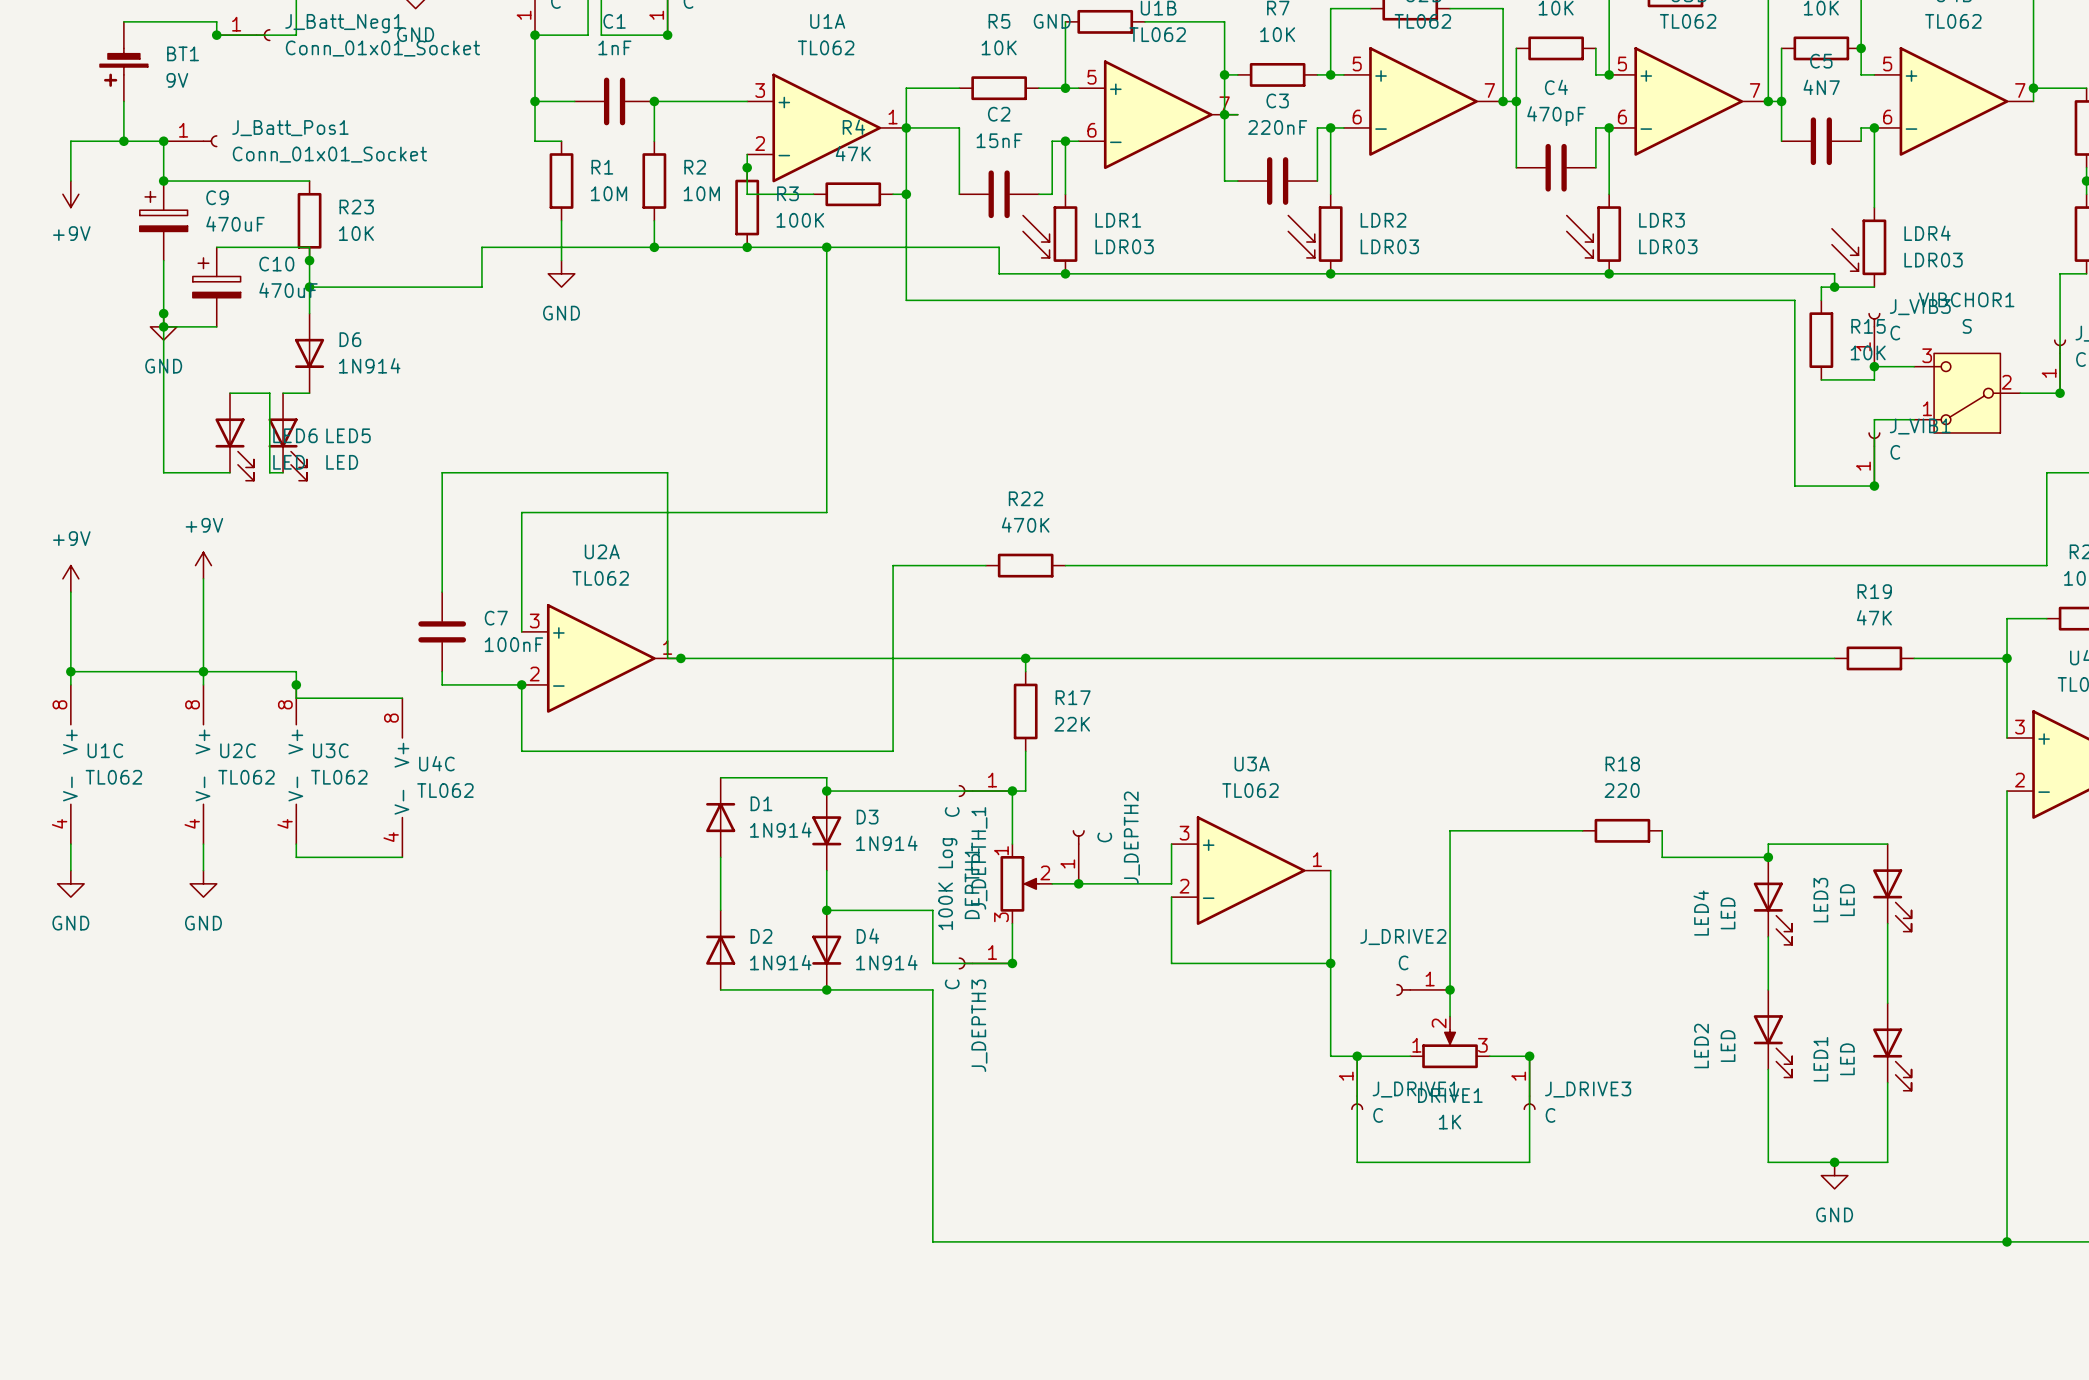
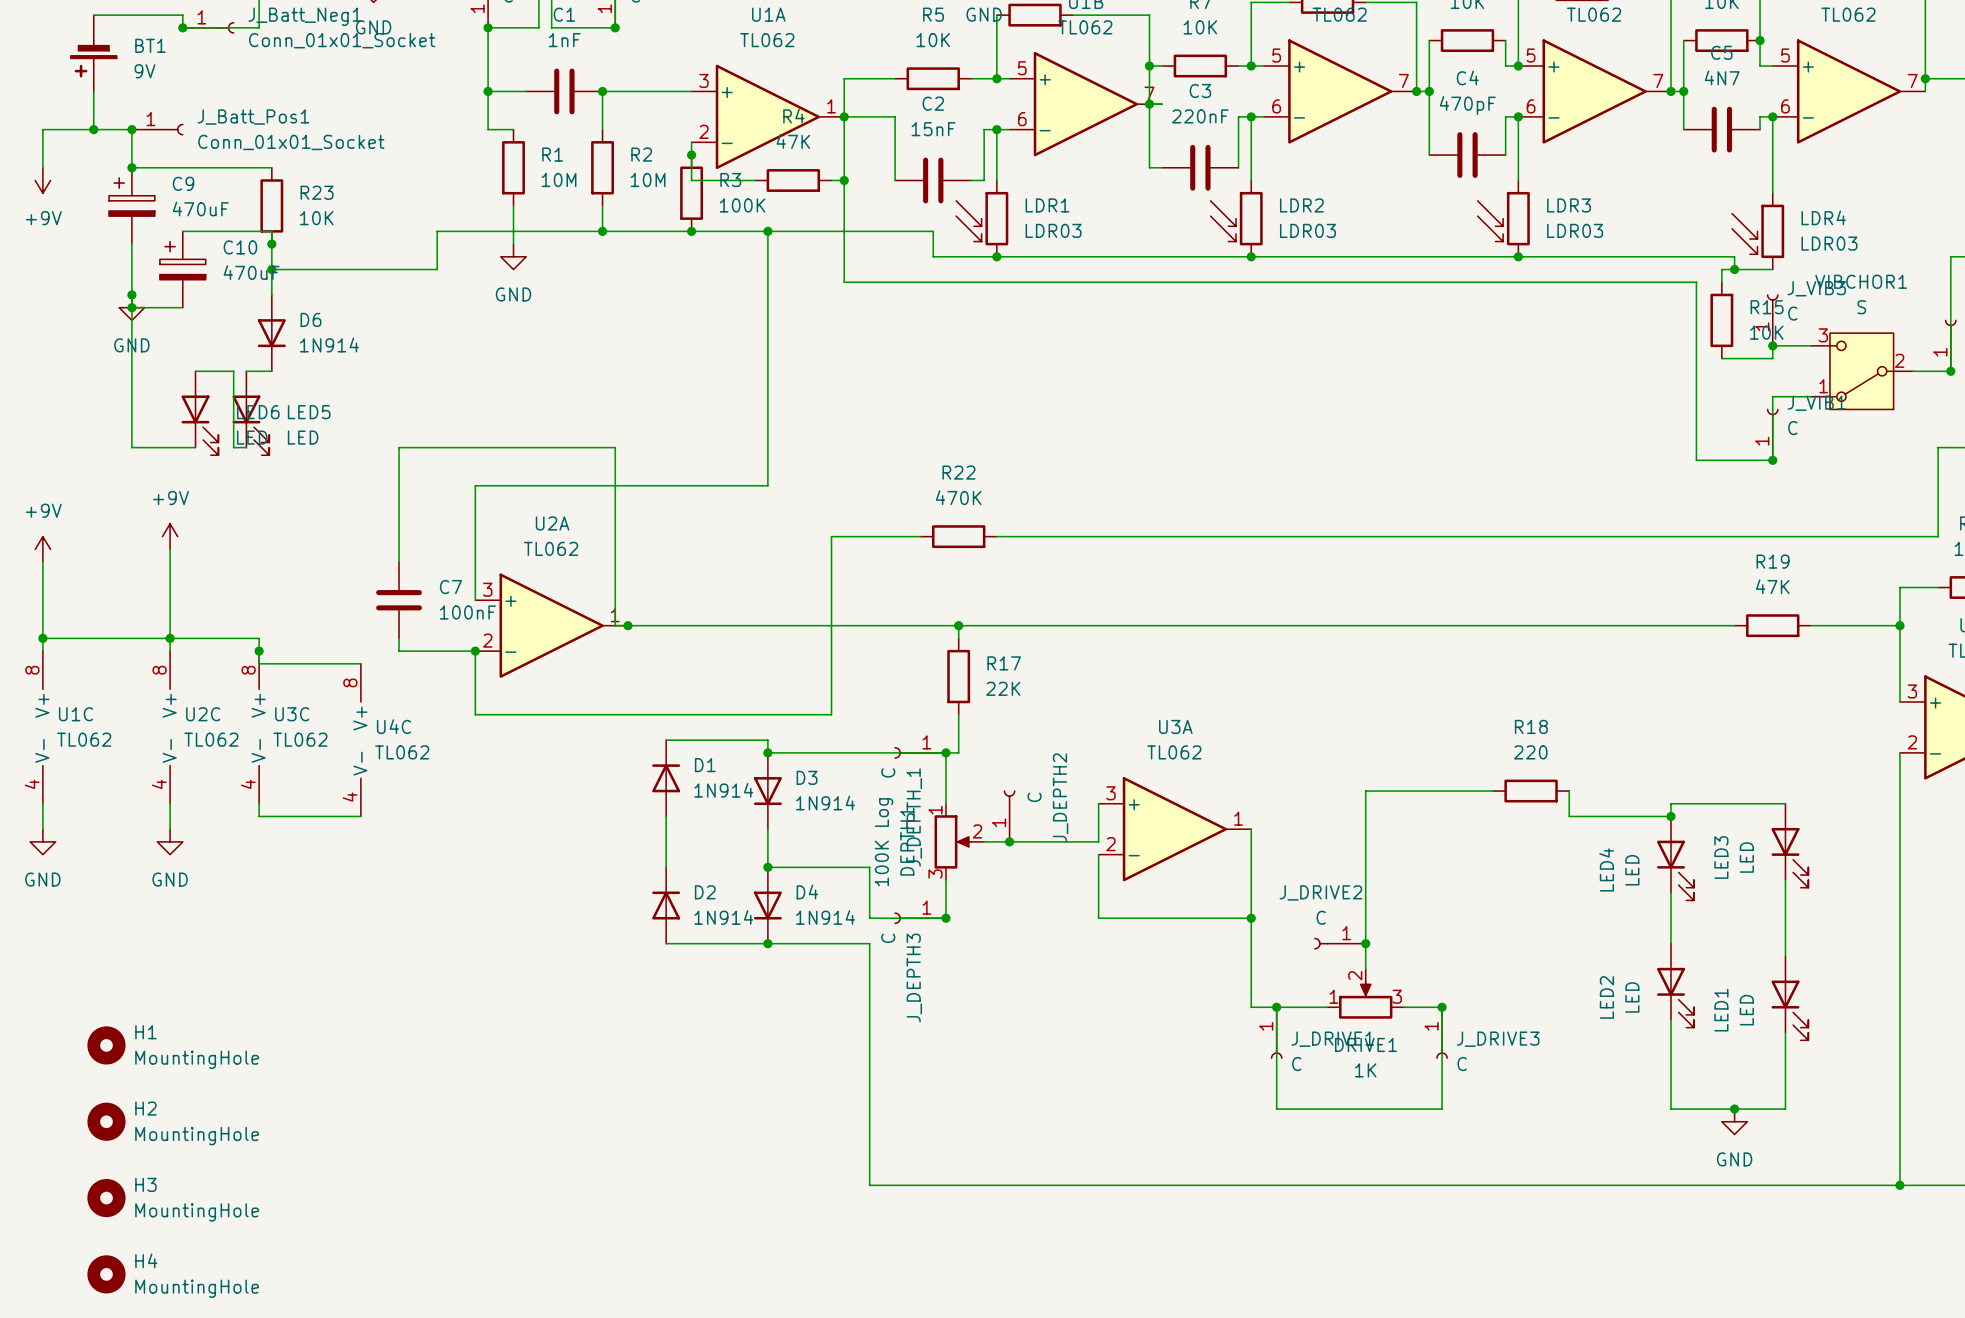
H1: none -> MountingHole (106, 1045)
H2: none -> MountingHole (106, 1121)
H3: none -> MountingHole (106, 1198)
H4: none -> MountingHole (106, 1274)

